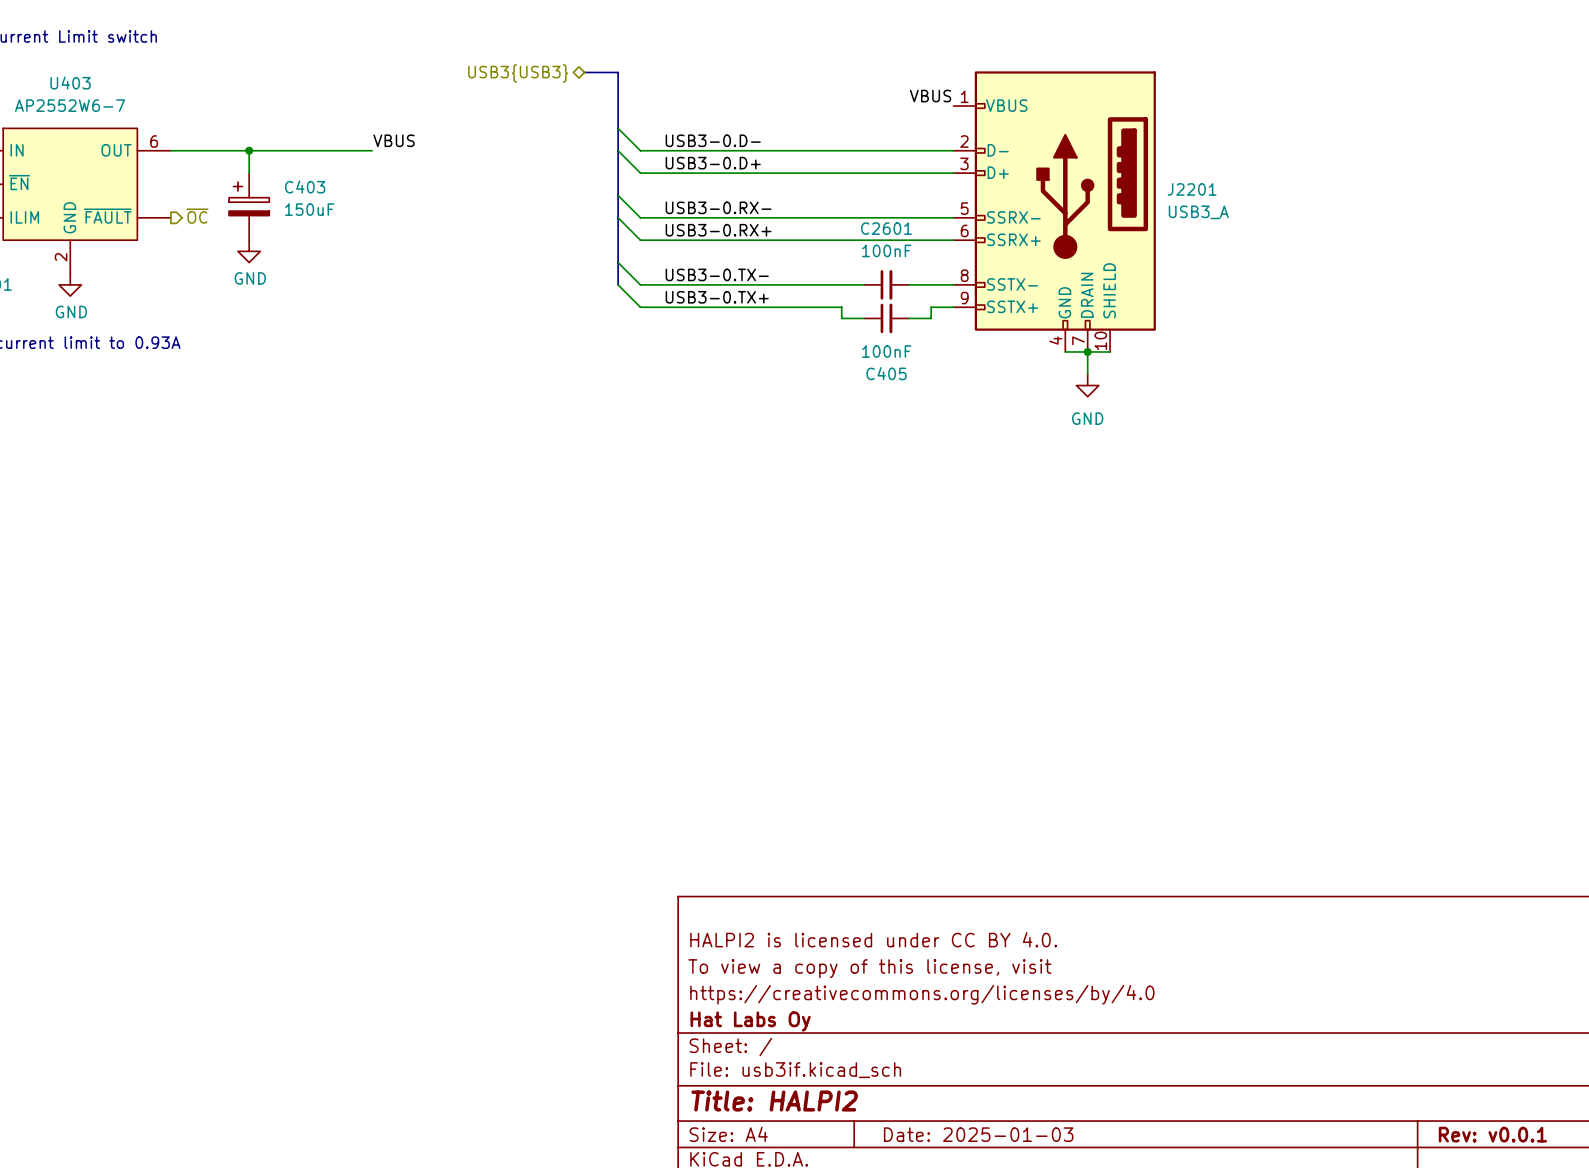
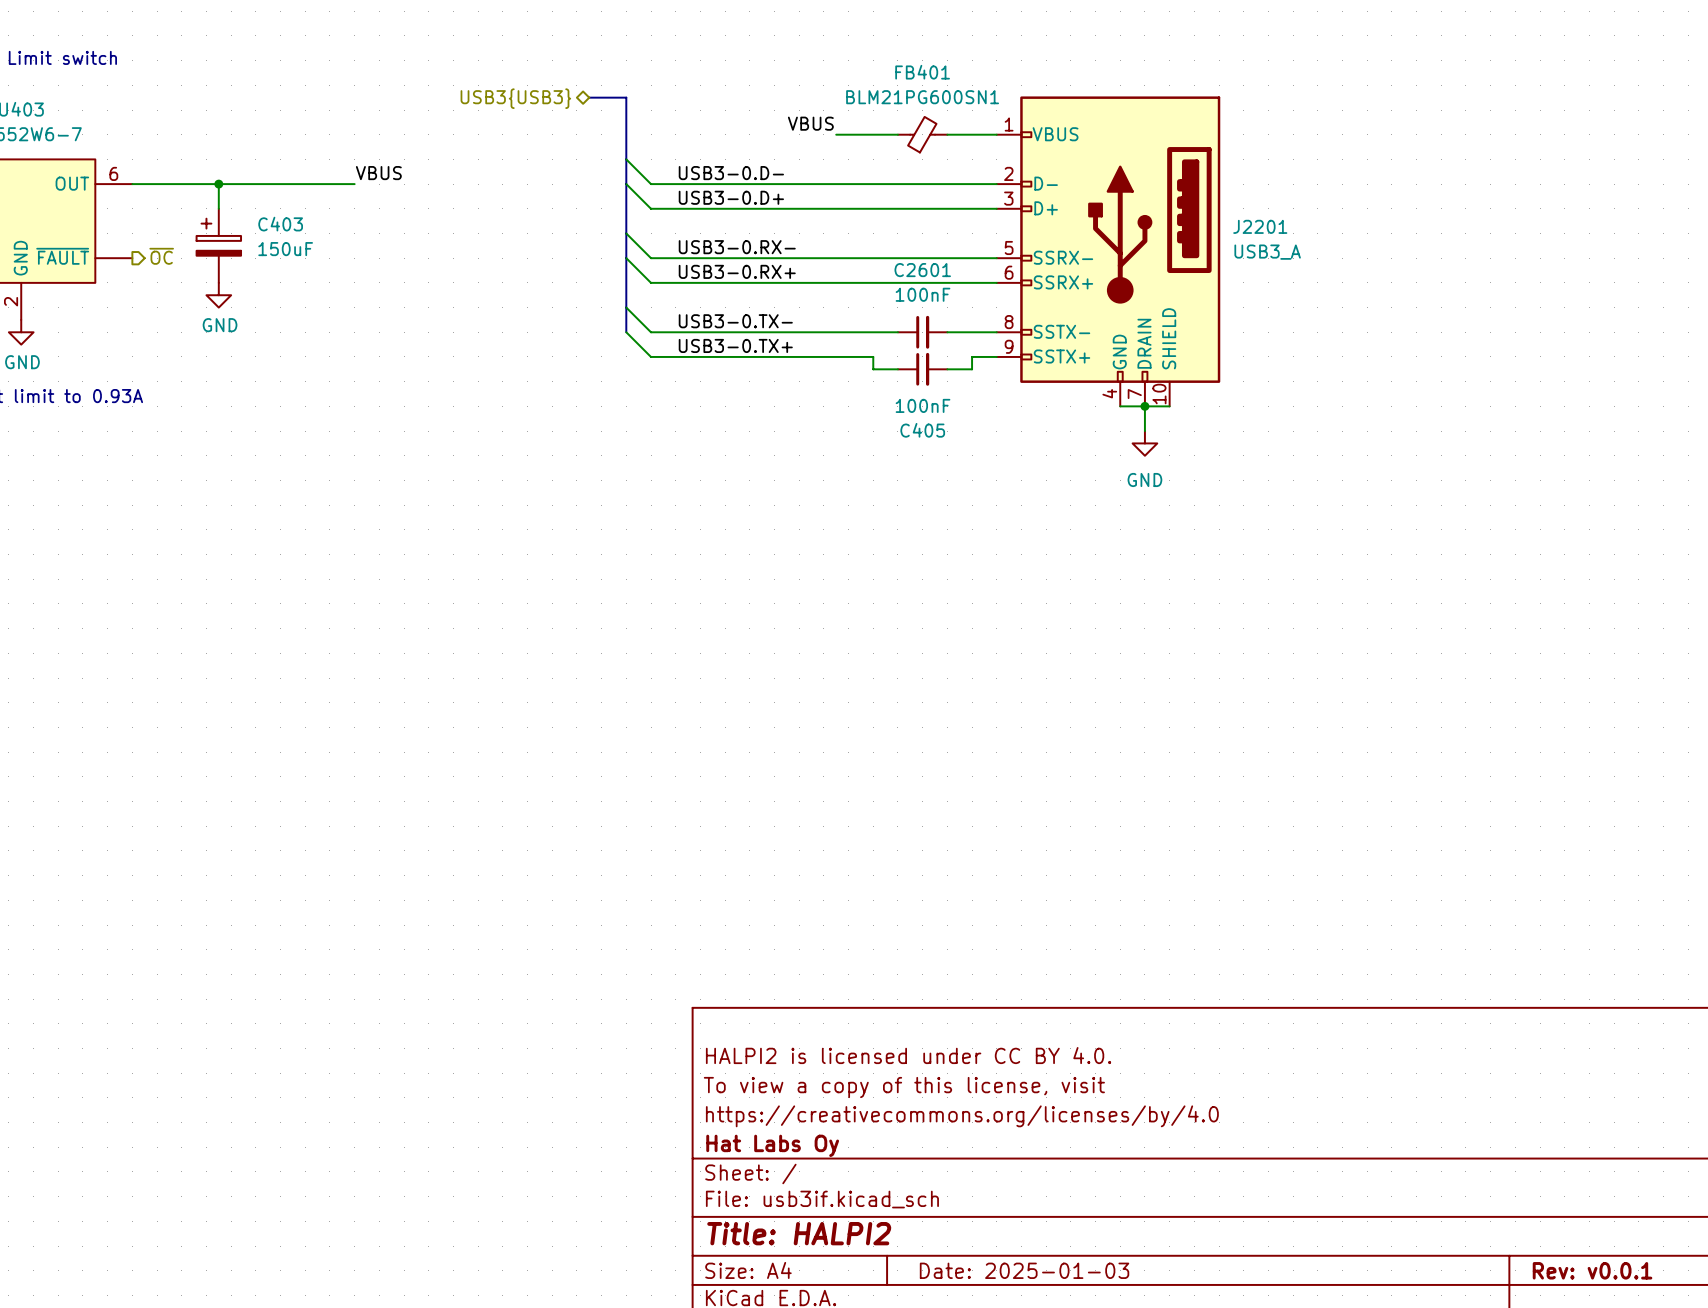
label position: VBUS (930, 96) -> VBUS (810, 123)
wire: none -> (836, 134) (897, 134)
FB401: none -> BLM21PG600SN1 (922, 134)
wire: none -> (947, 134) (996, 134)

